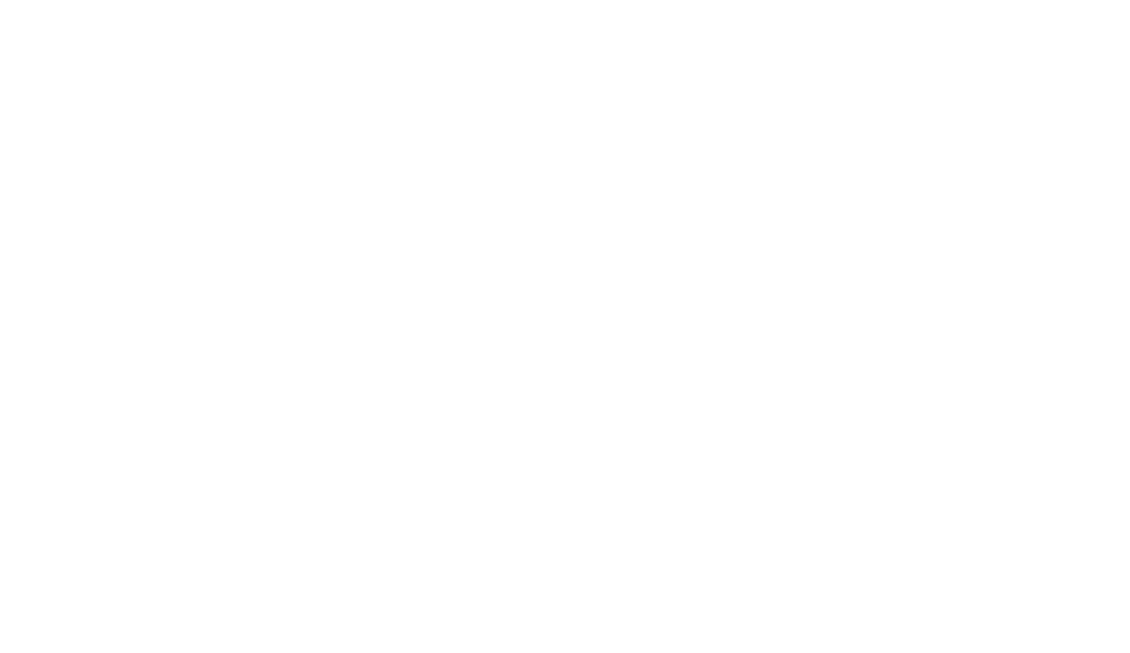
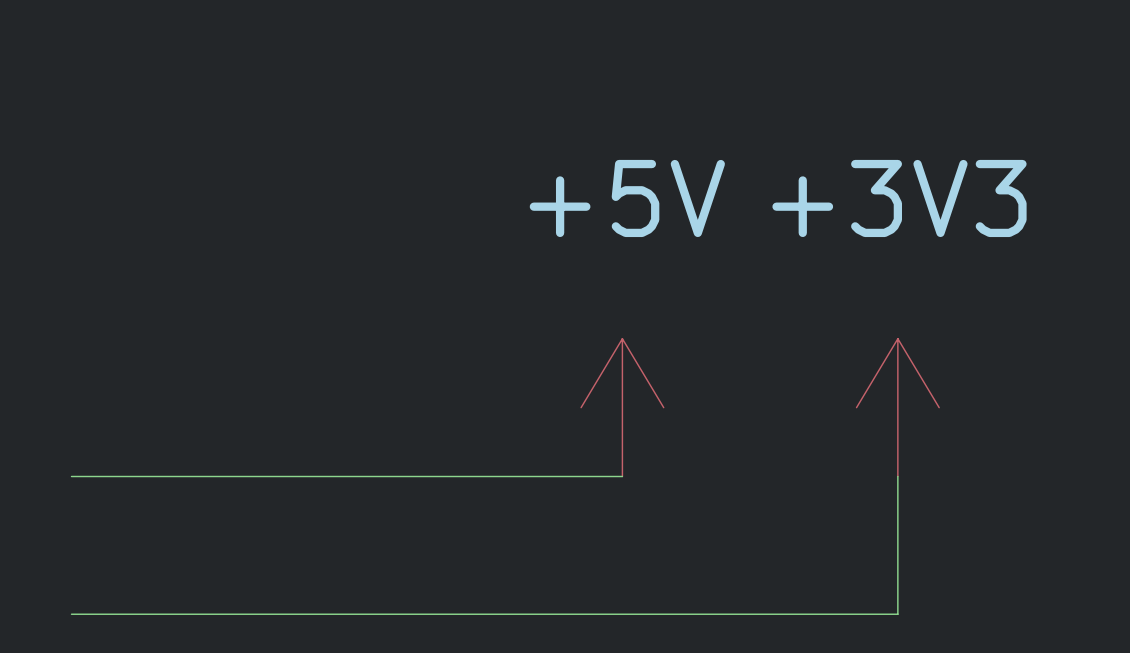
power symbol: none -> +5V (622, 407)
power symbol: none -> +3V3 (897, 407)
wire: none -> (71, 476) (622, 476)
wire: none -> (897, 476) (897, 614) (71, 614)

